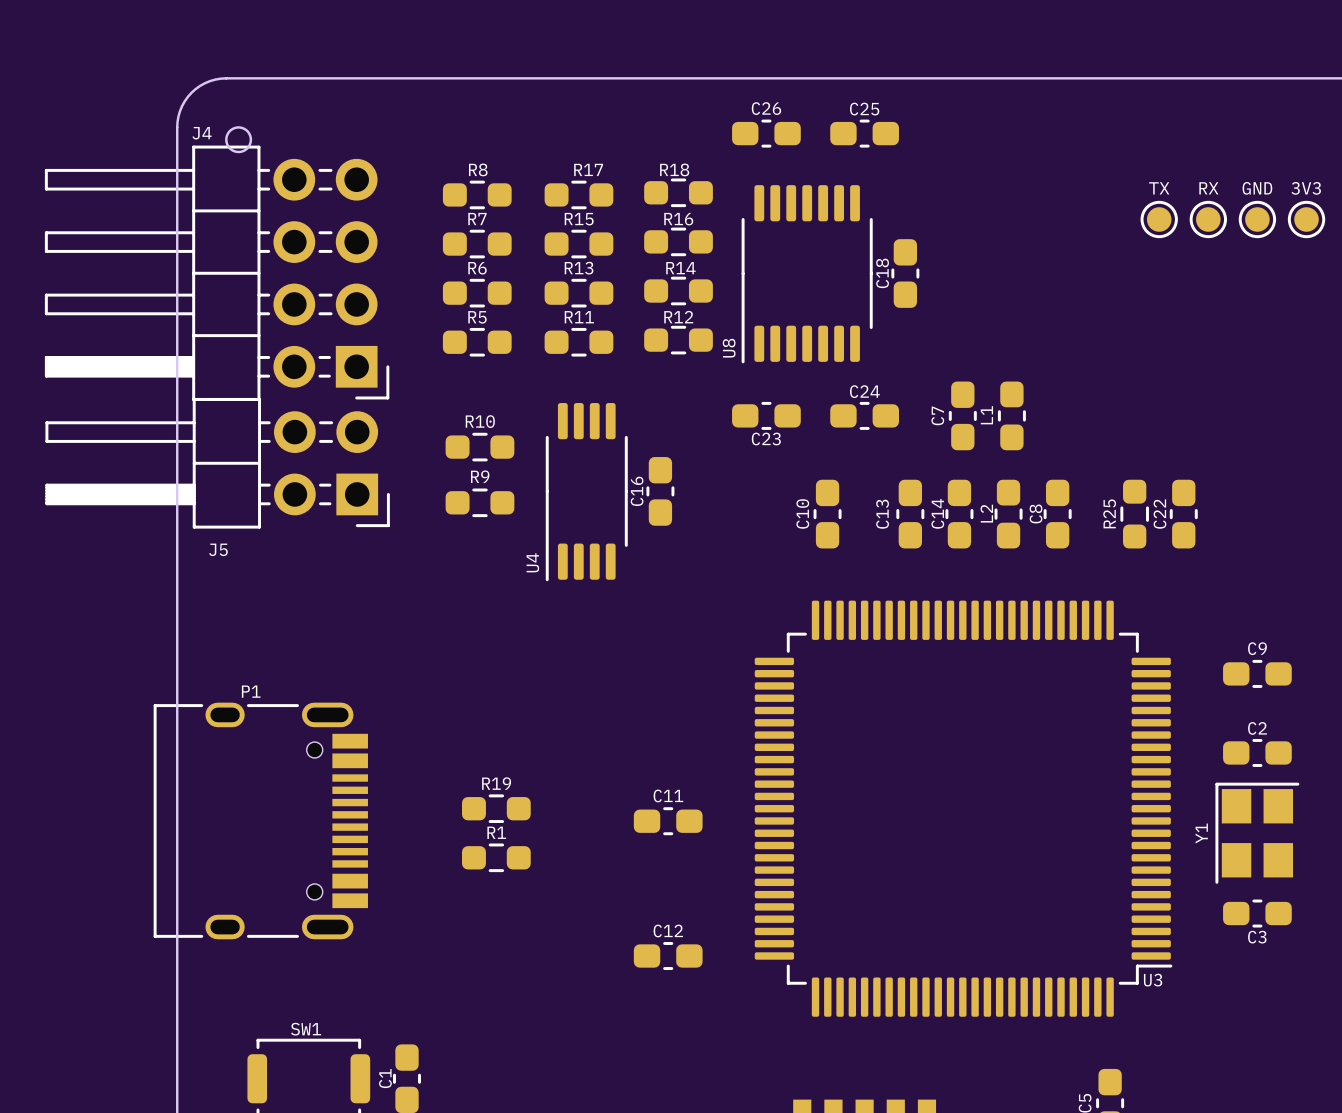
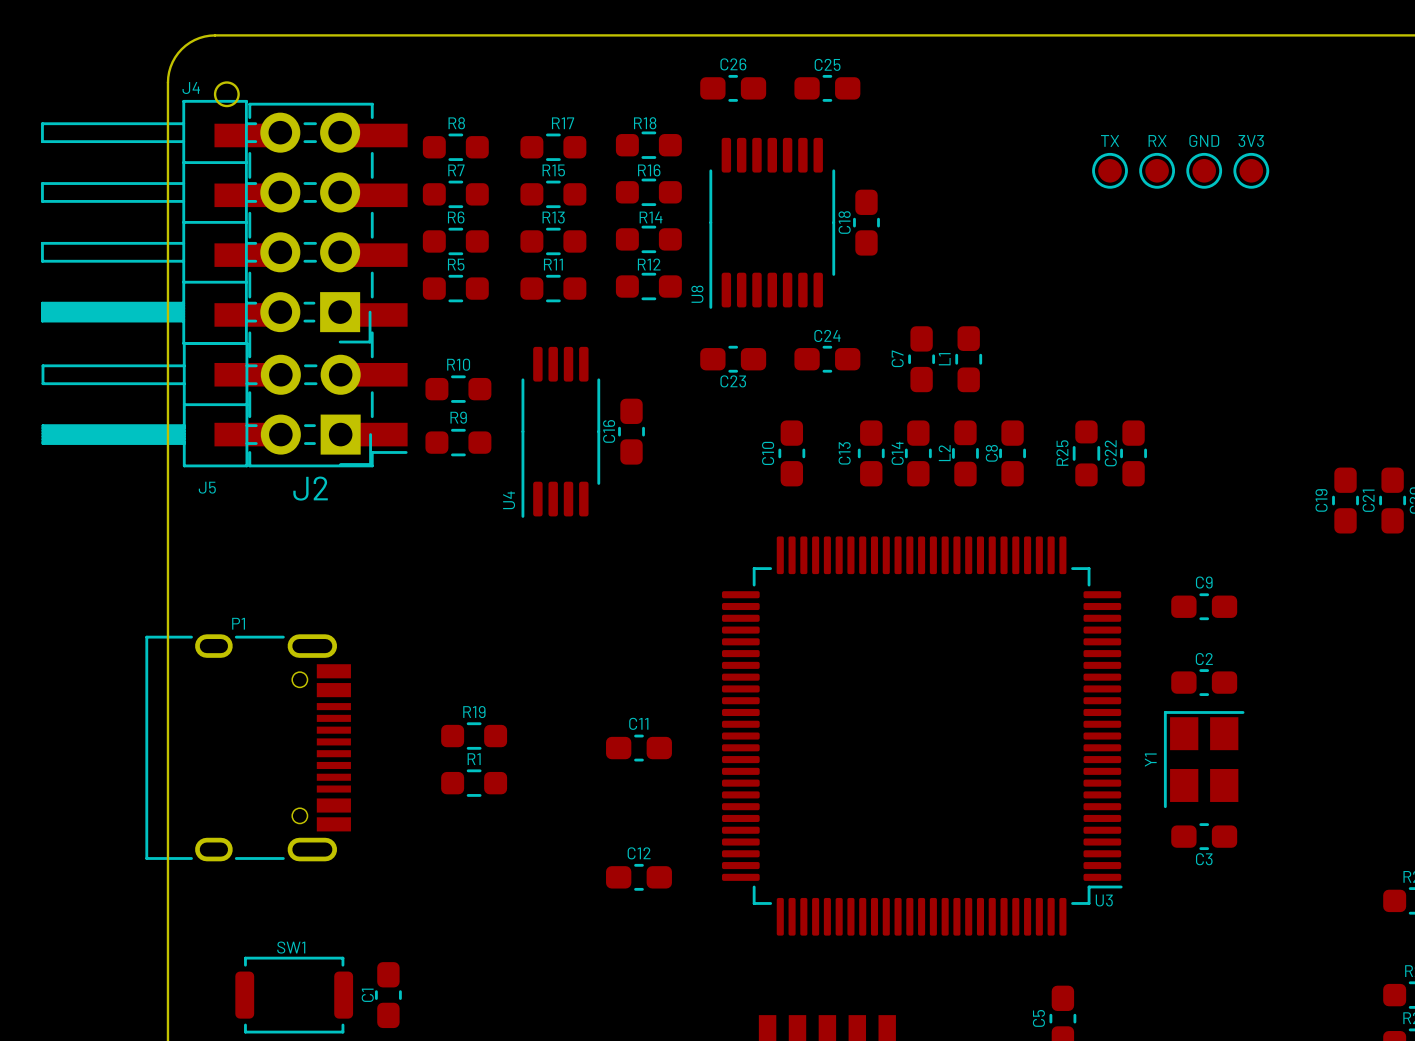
J2: none -> (311, 285)

